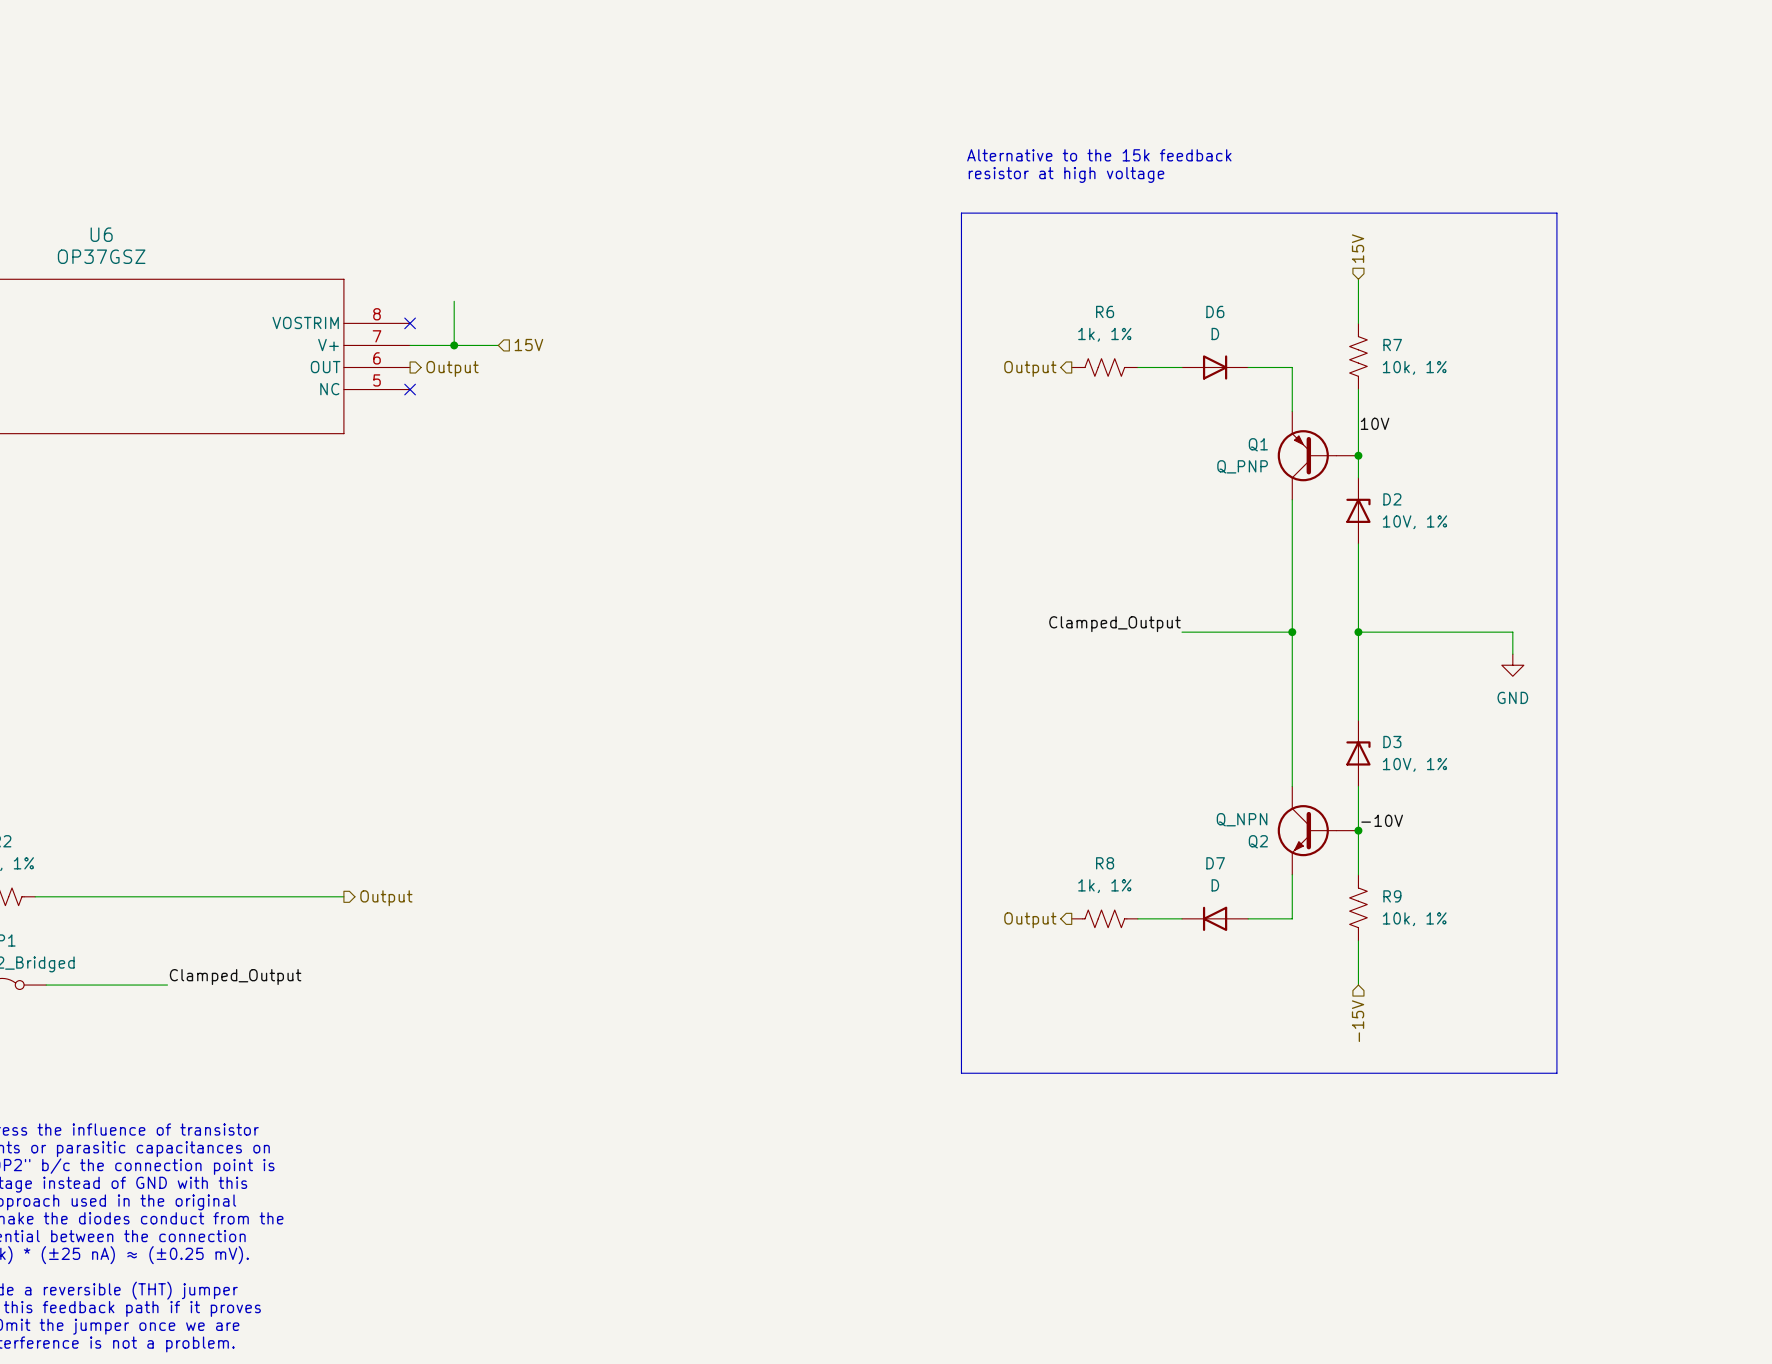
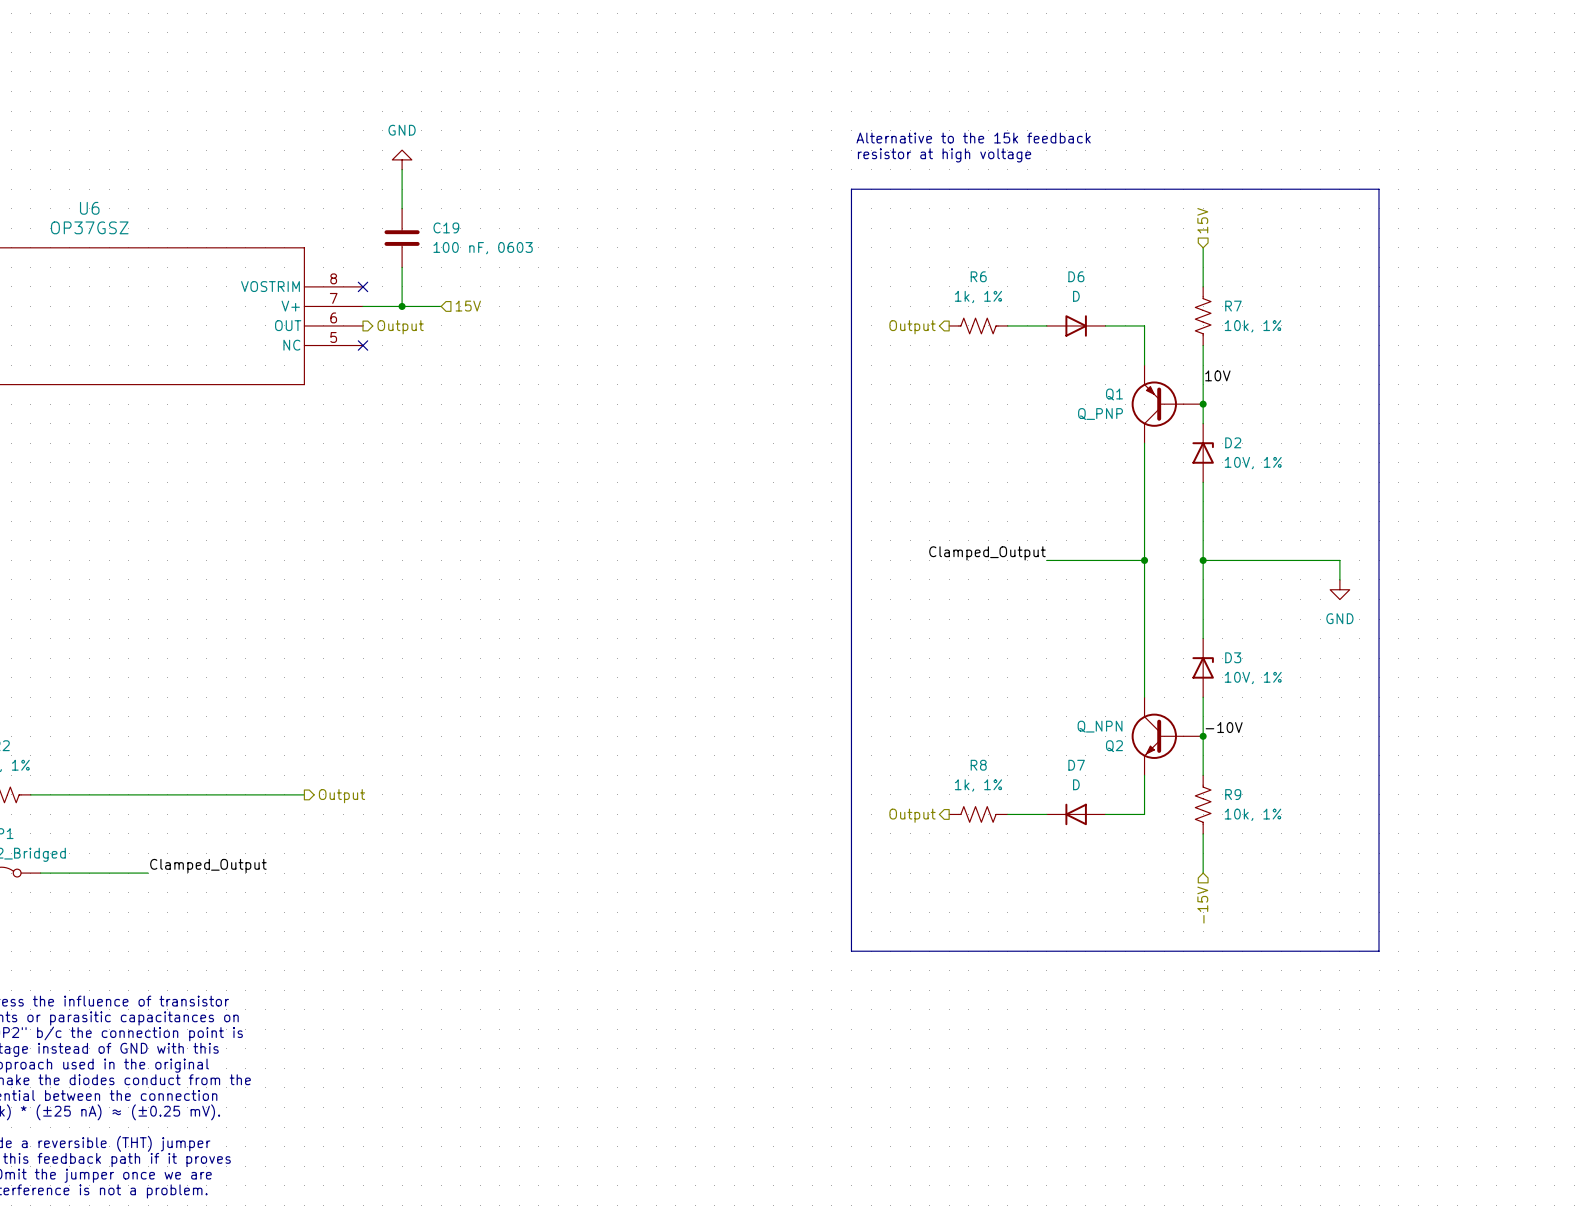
power symbol: none -> GND (402, 159)
wire: none -> (402, 169) (402, 208)
C19: none -> 100 nF, 0603 (402, 238)

